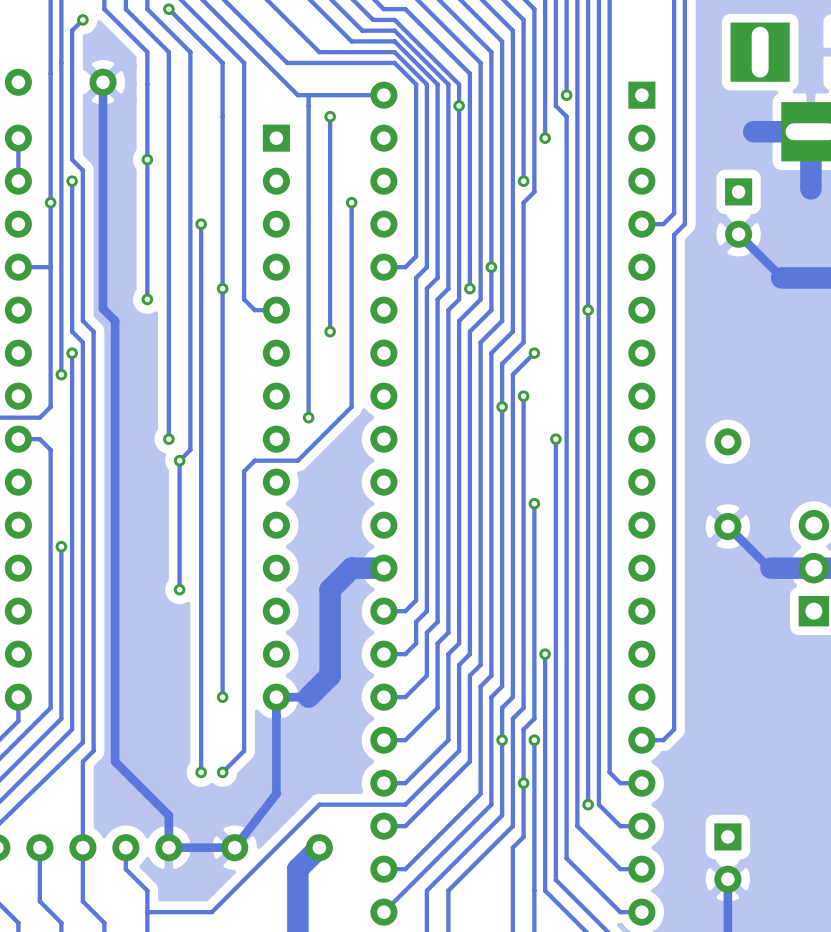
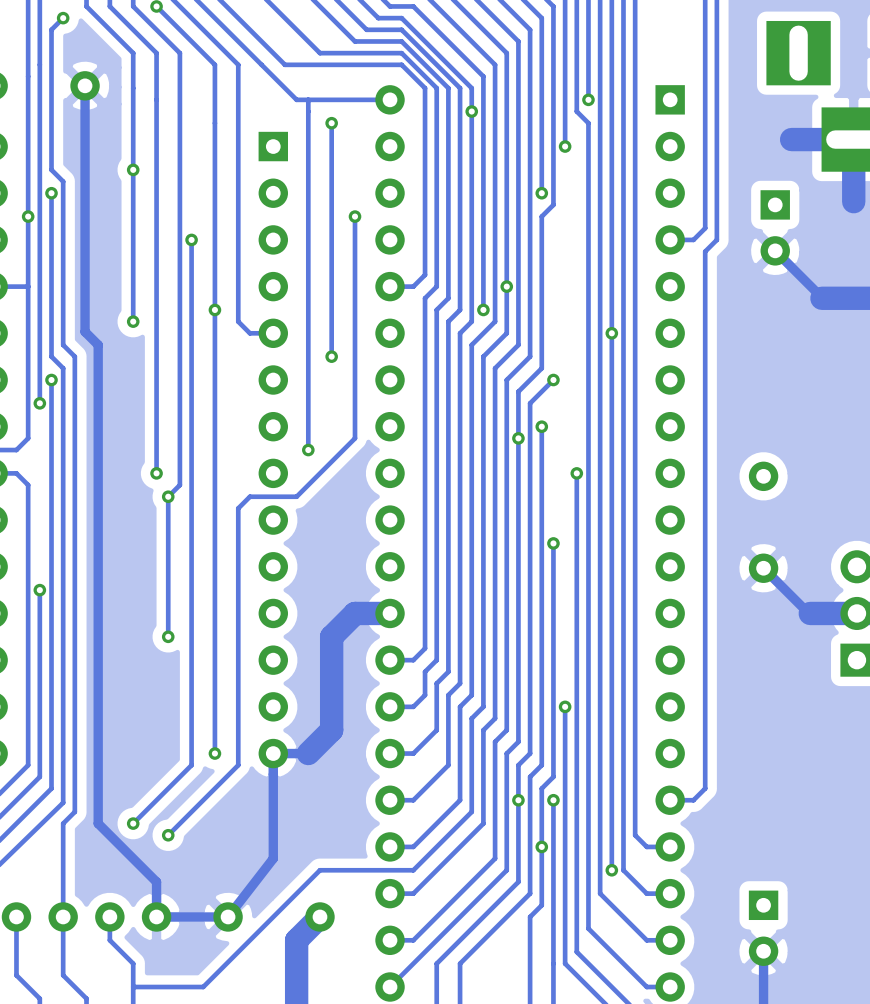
track: (201, 707) (201, 772) -> (191, 765) (133, 823)
track: (244, 707) (244, 750) (222, 772) -> (238, 765) (168, 835)
via: none -> (133, 823)
via: none -> (168, 835)
via: (201, 772) -> none
via: (222, 772) -> none

